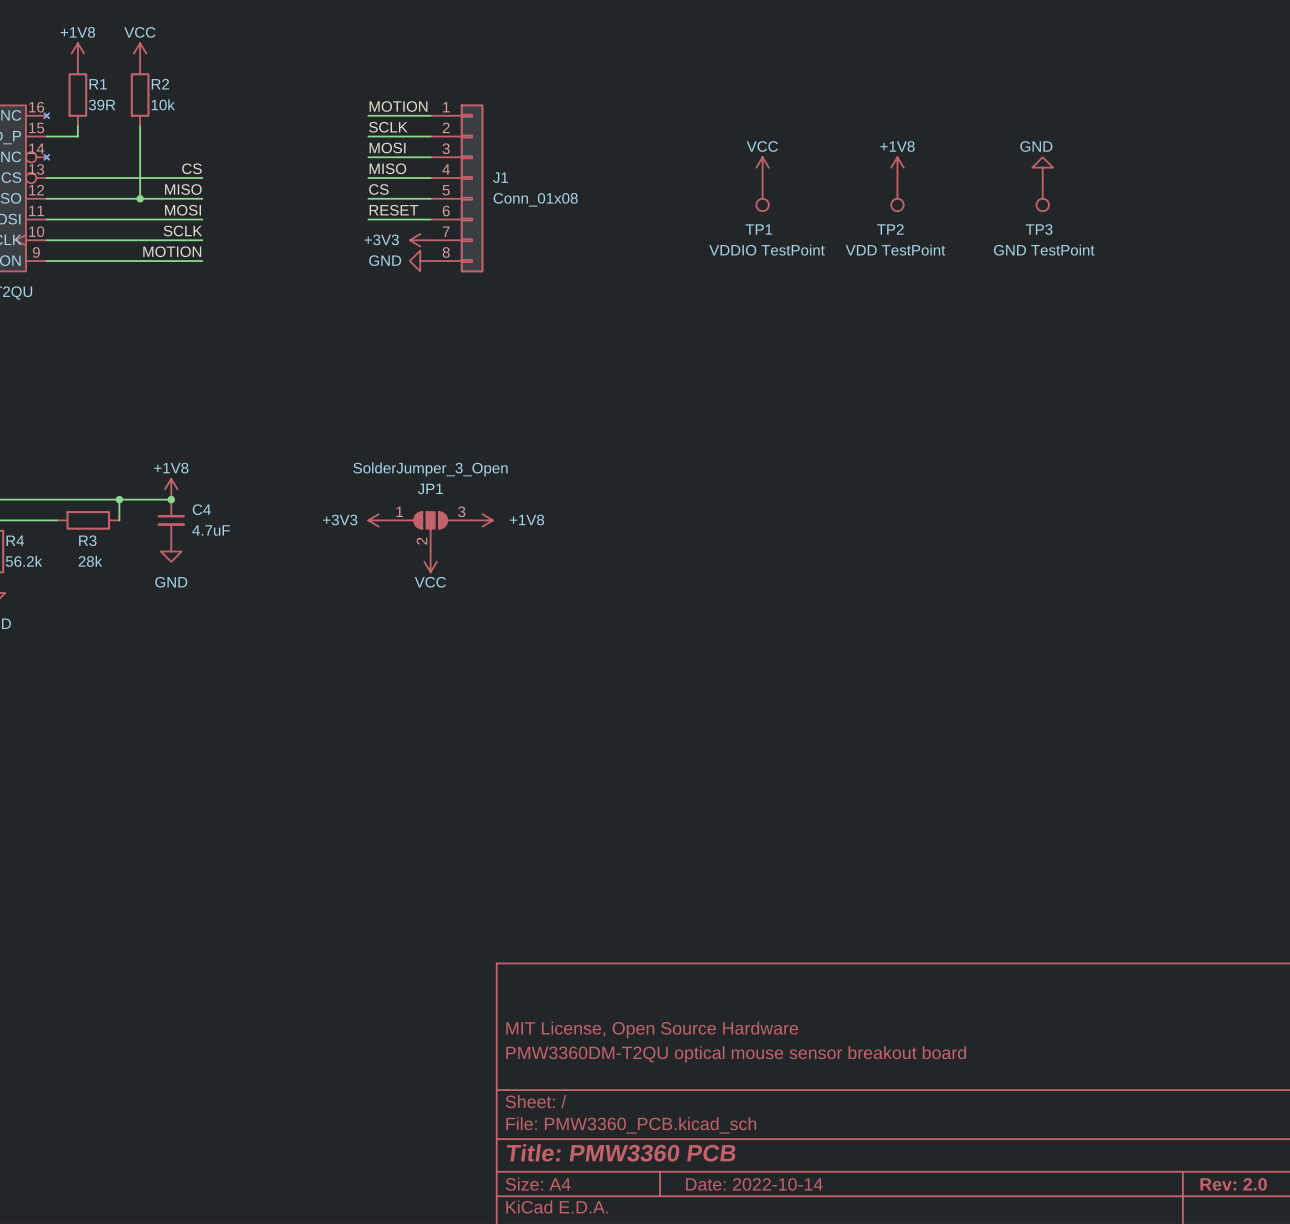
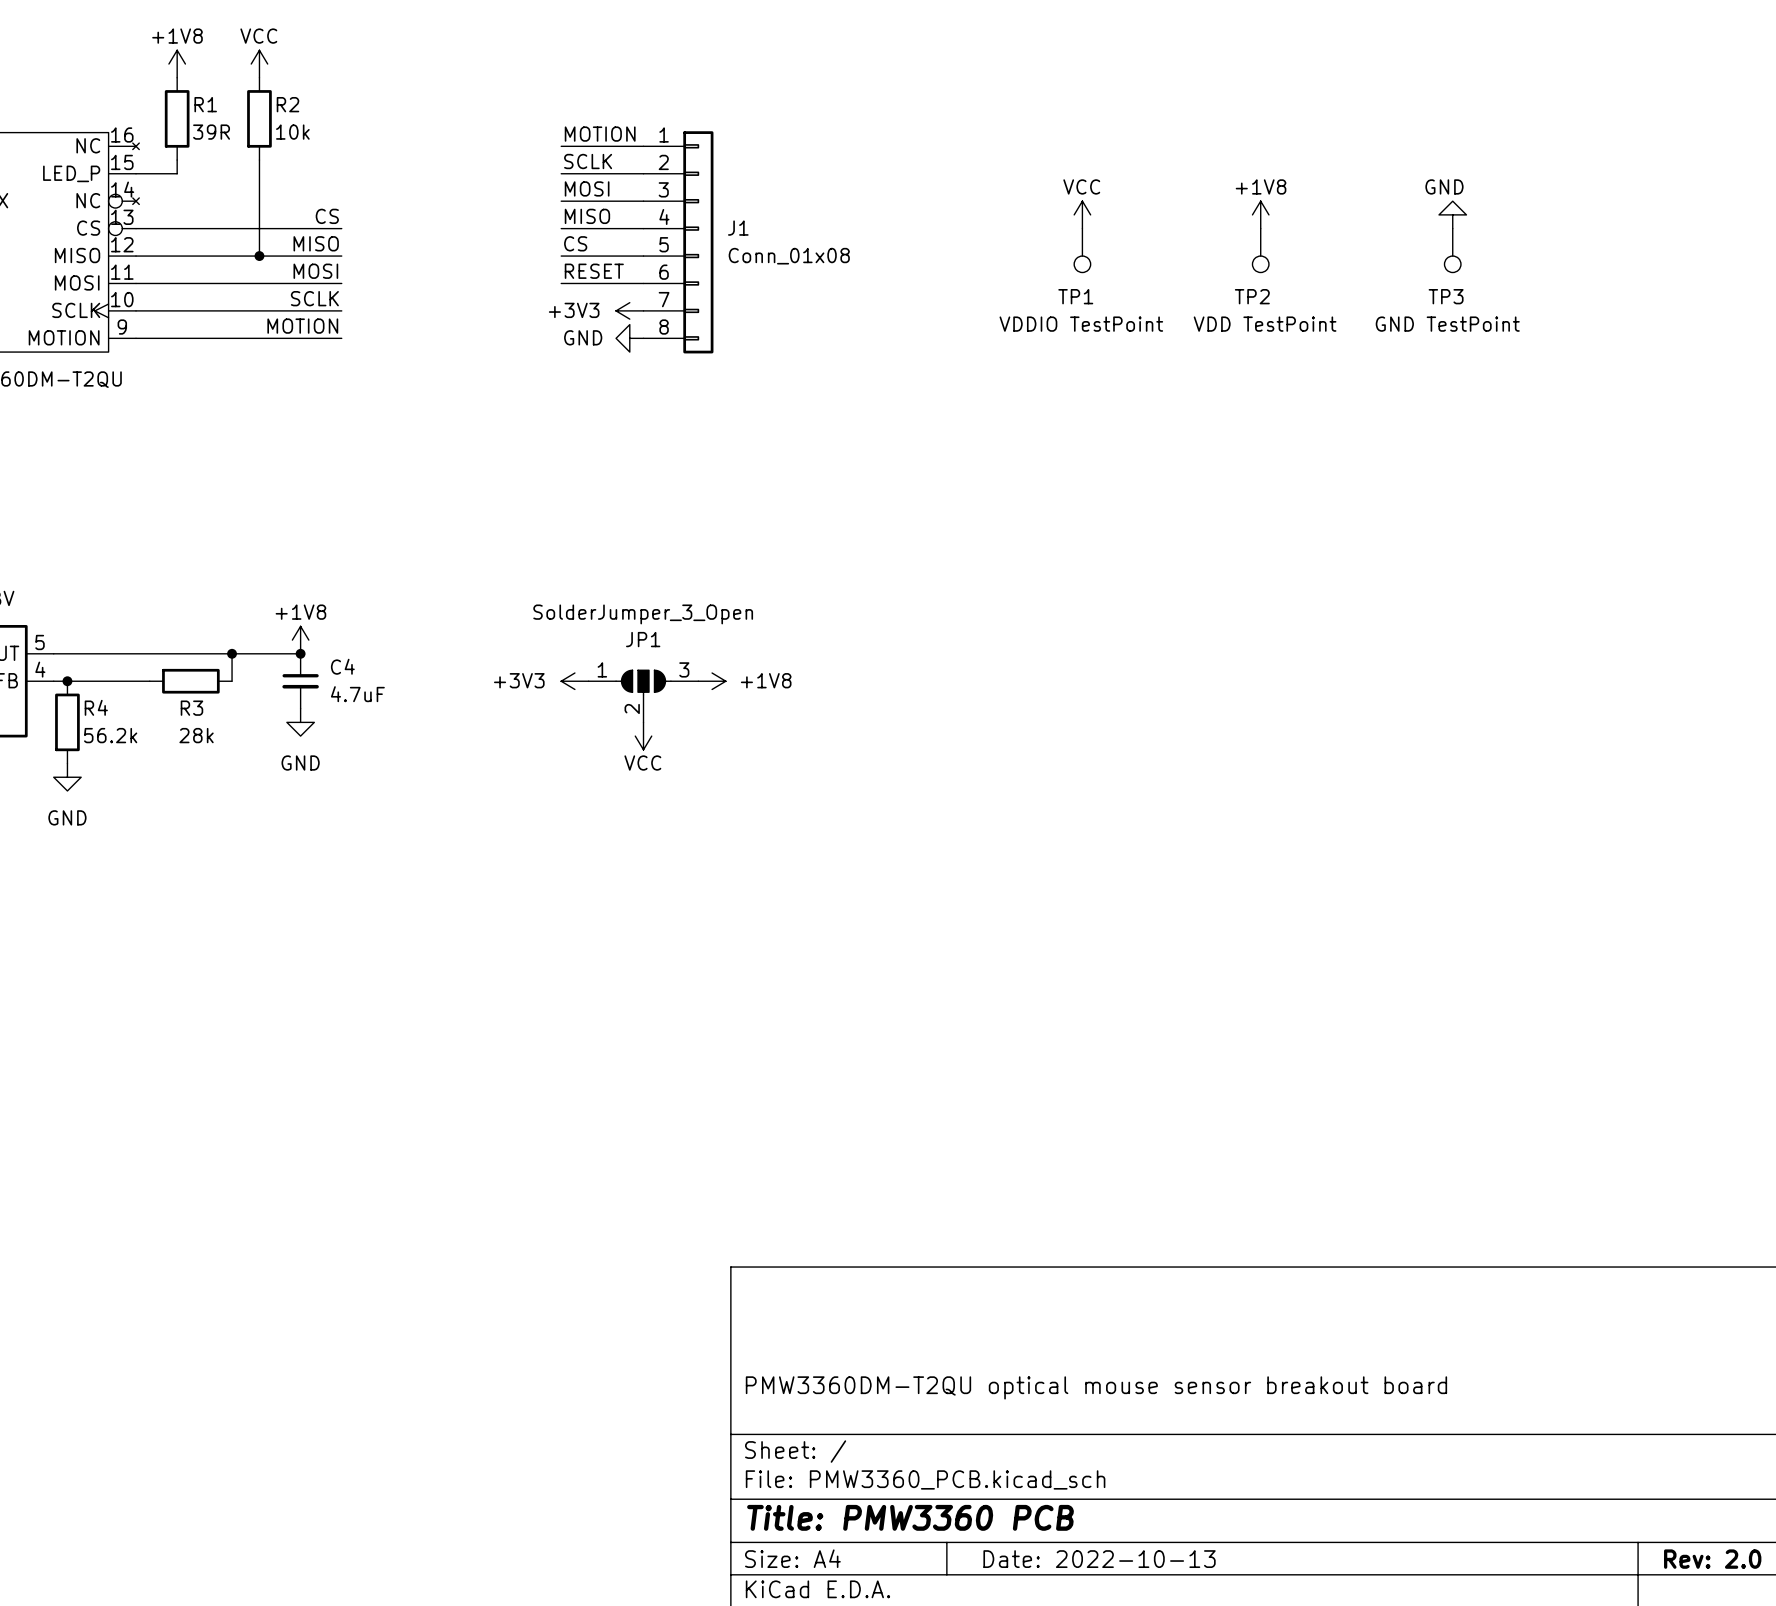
title block: MIT License, Open Source Hardware (652, 1029) -> none
title block: Date: 2022-10-14 (754, 1184) -> Date: 2022-10-13 (1099, 1559)

